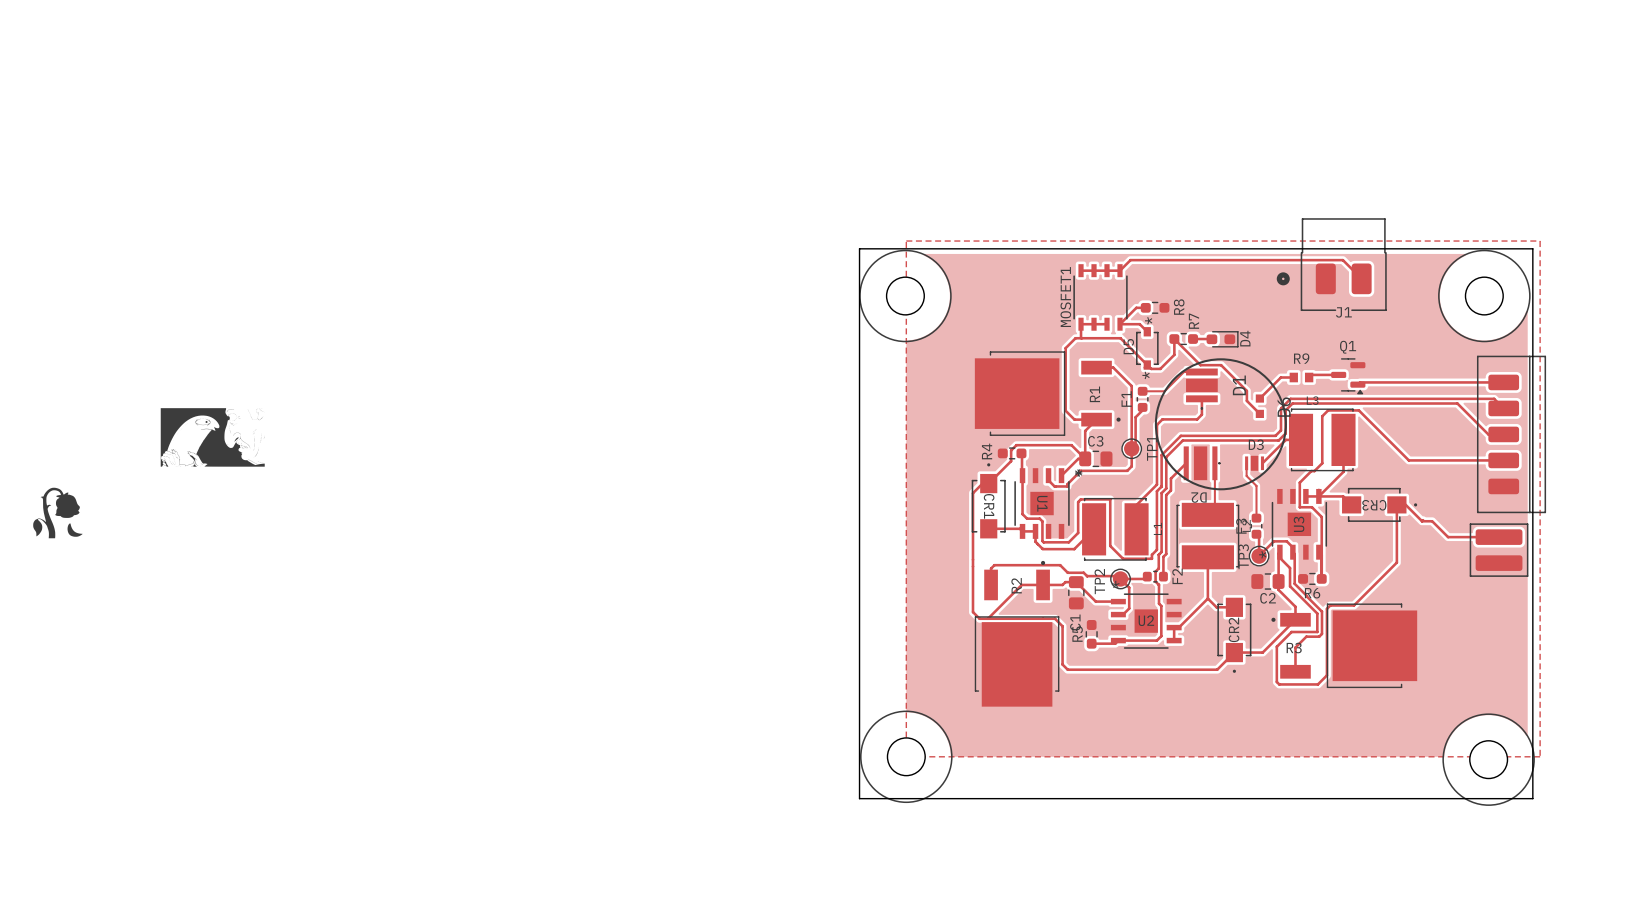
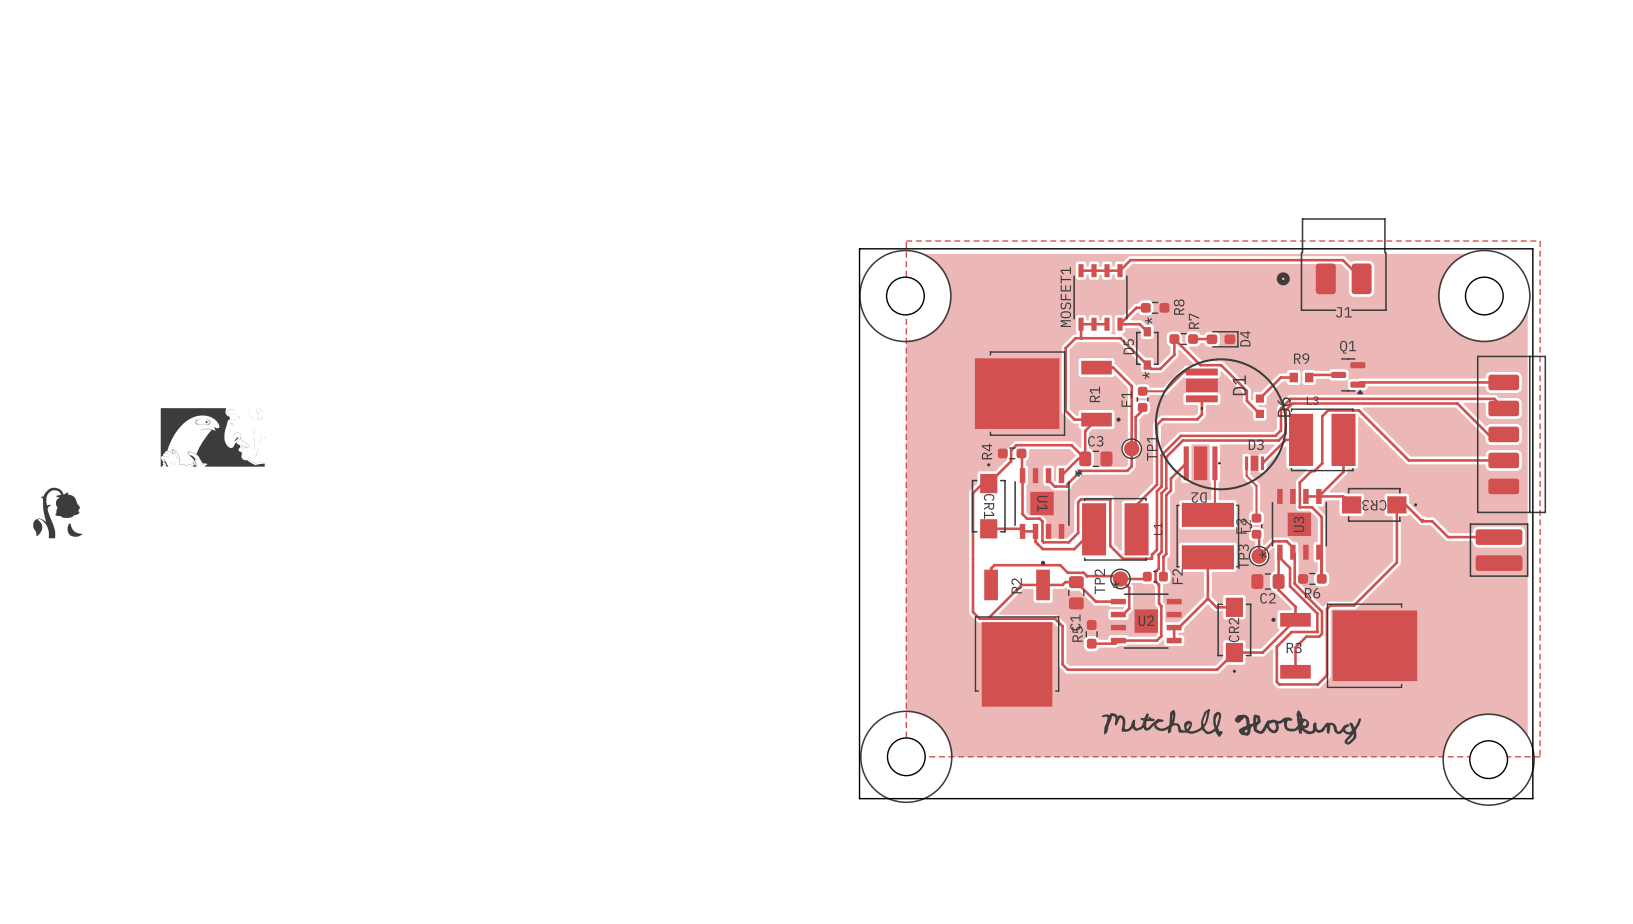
drawing: none -> [1101, 709, 1361, 745]

